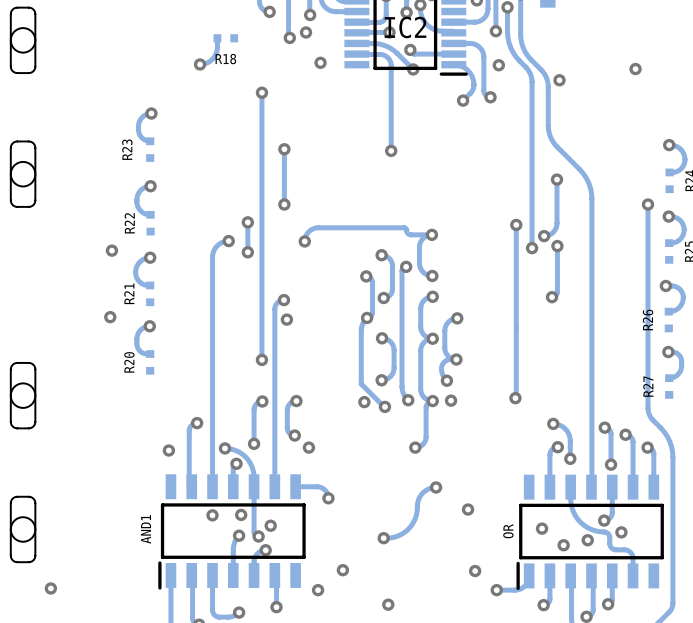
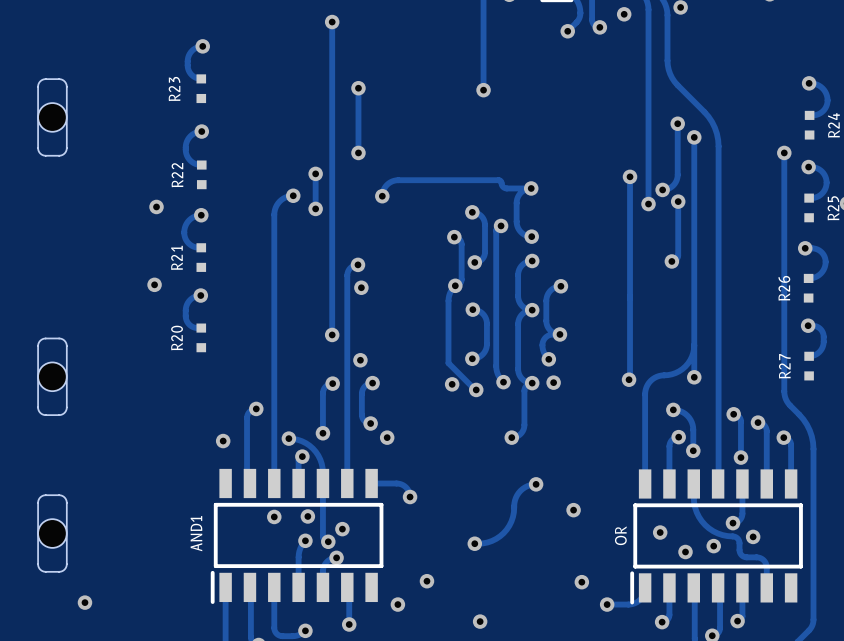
via: none -> (624, 14)
track: none -> (694, 137) (694, 377)
via: none -> (694, 137)
track: none -> (694, 345) (691, 356) (685, 366) (675, 373) (654, 377) (646, 387) (645, 483)
via: none -> (360, 360)
via: none -> (694, 377)

